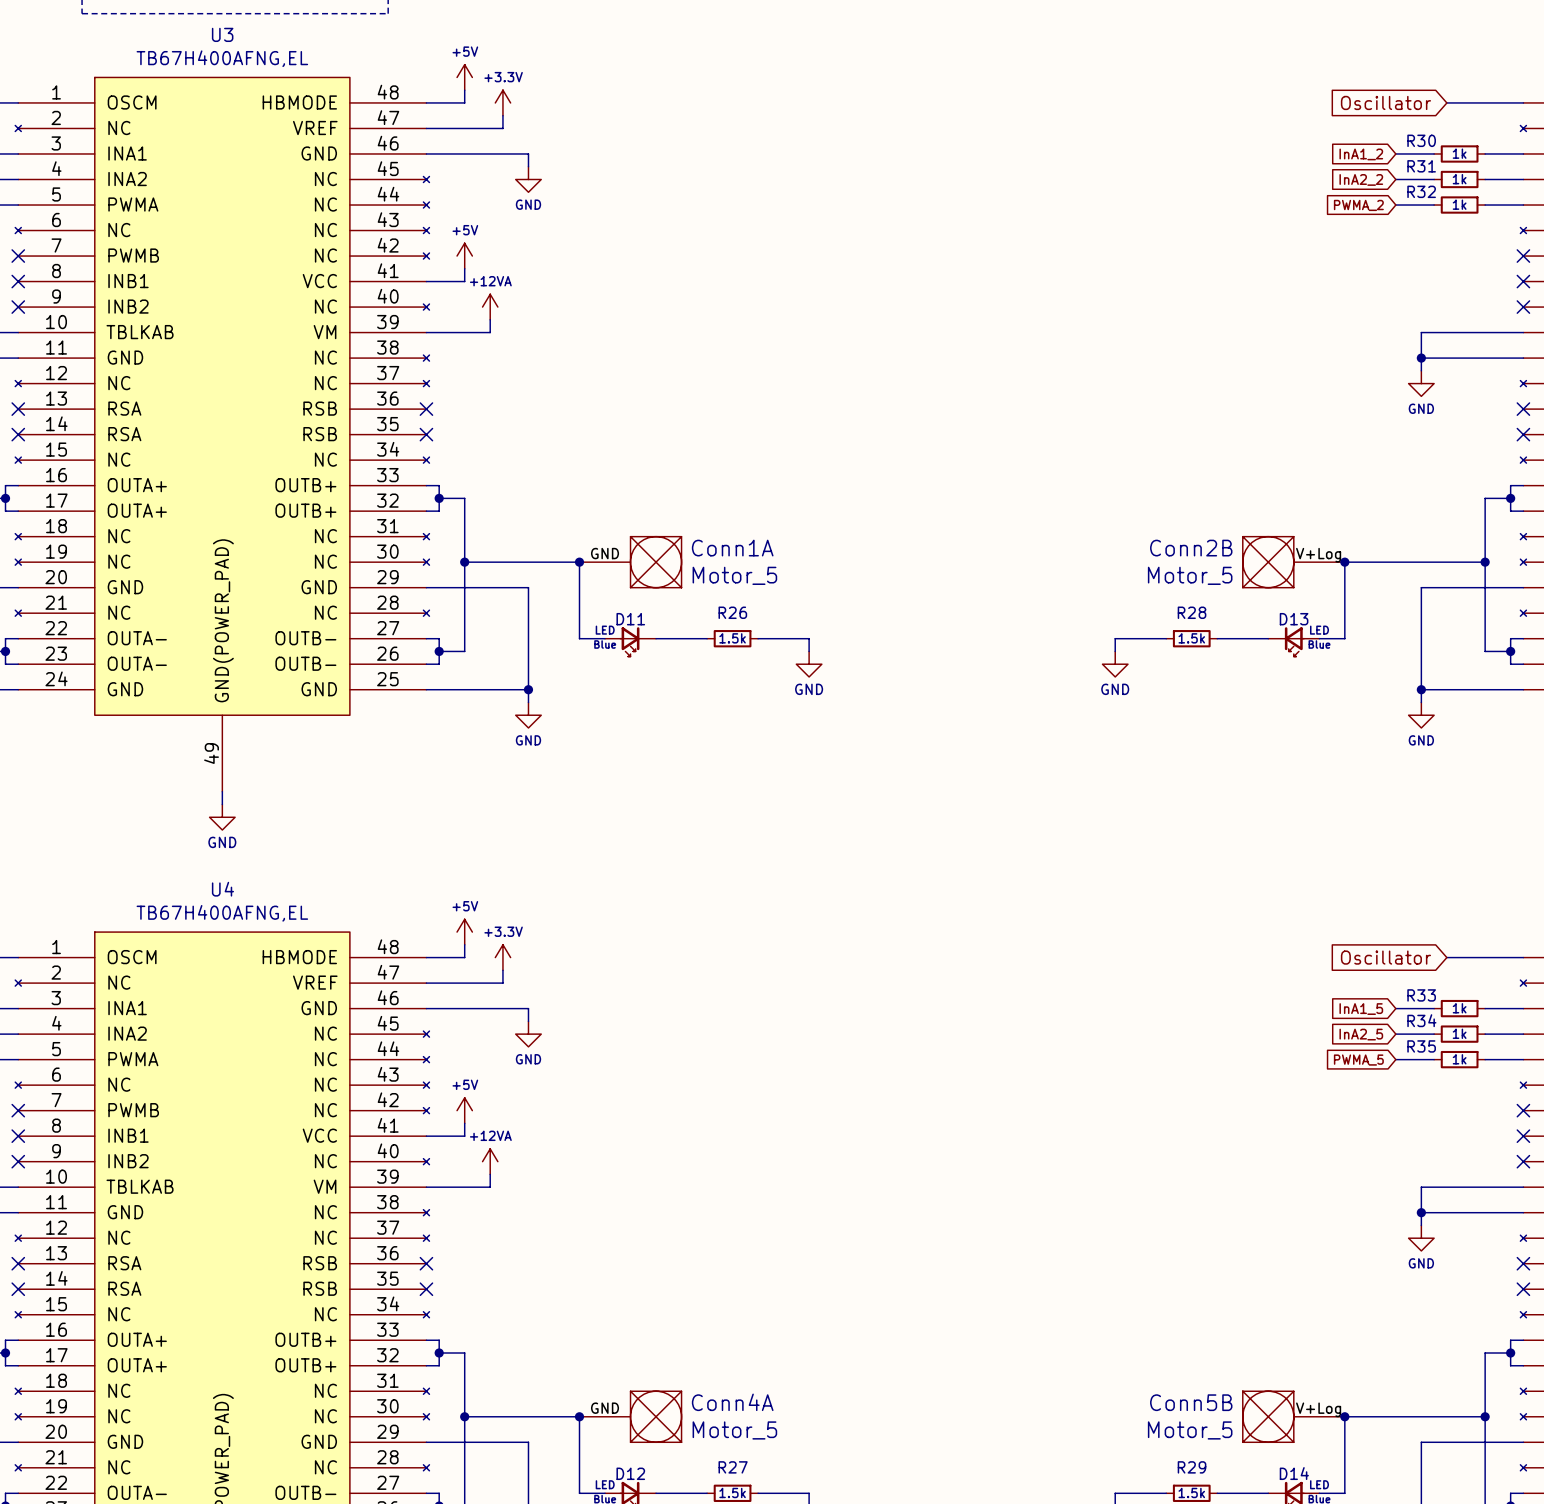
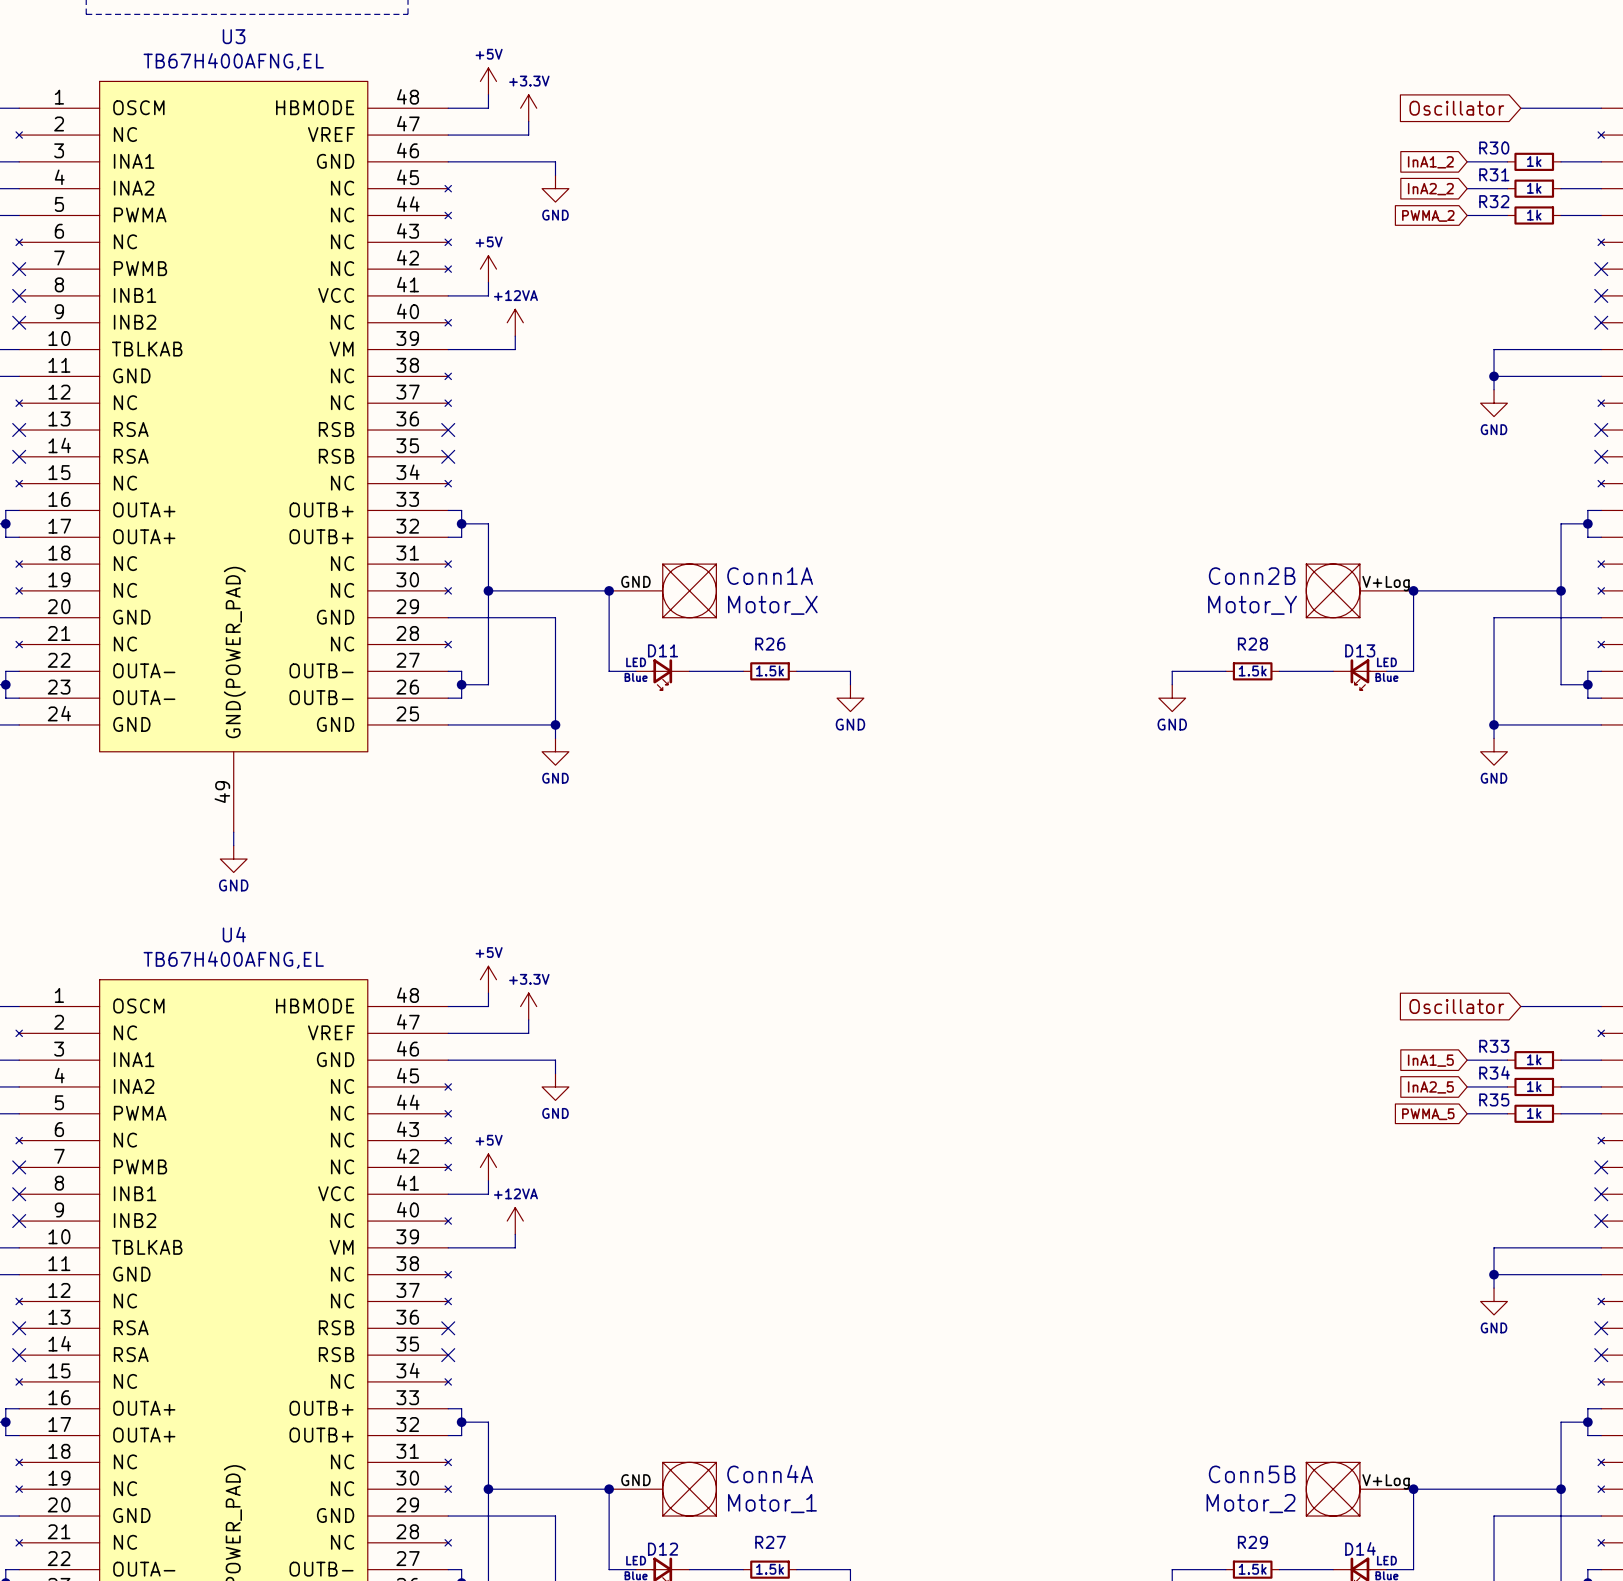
Conn1A value: Motor_5 (734, 575) -> Motor_X (772, 605)
Conn2B value: Motor_5 (1190, 575) -> Motor_Y (1252, 605)
Conn4A value: Motor_5 (734, 1430) -> Motor_1 (772, 1503)
Conn5B value: Motor_5 (1190, 1430) -> Motor_2 (1251, 1503)

